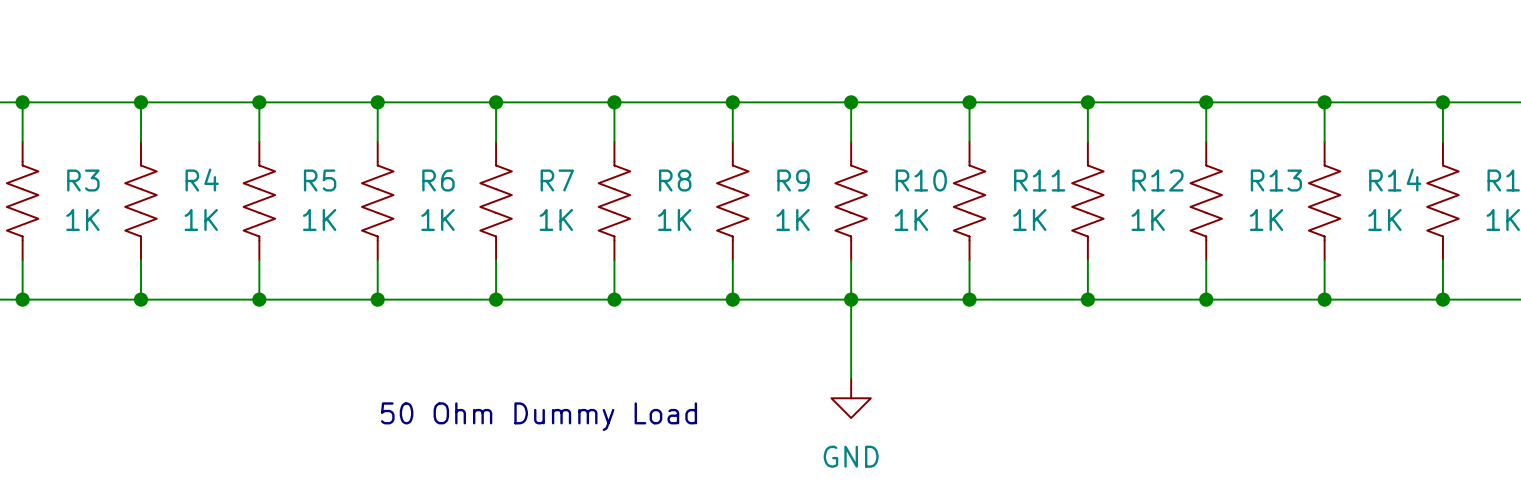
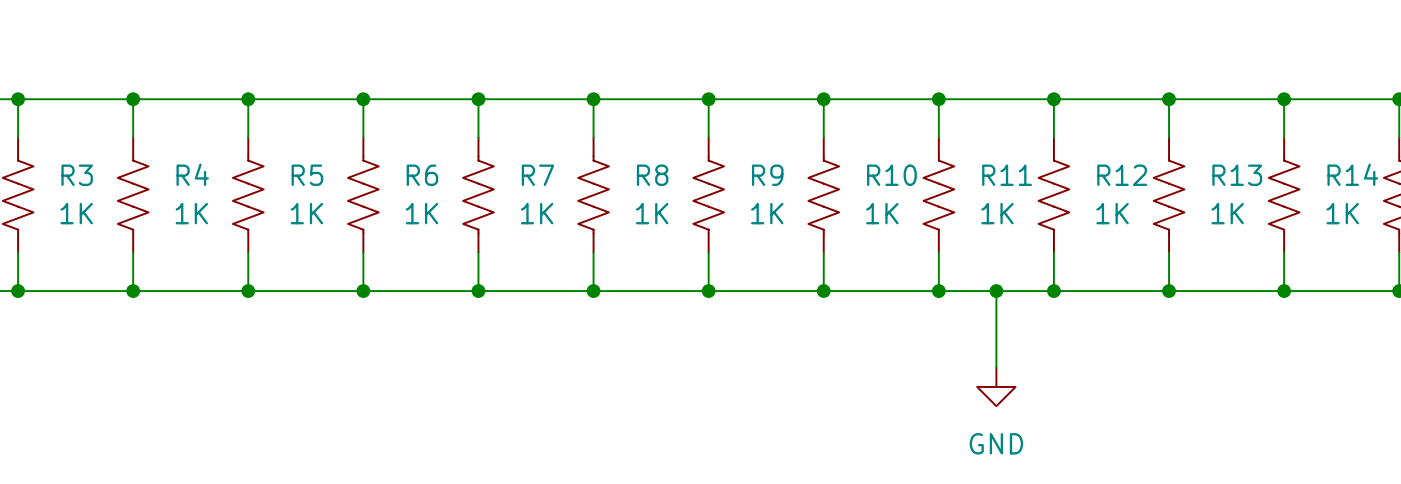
wire: (851, 299) (851, 378) -> (996, 291) (996, 367)
junction: none -> (996, 291)
power symbol position: GND (851, 398) -> GND (996, 386)
text: 50 Ohm Dummy Load (539, 416) -> none

